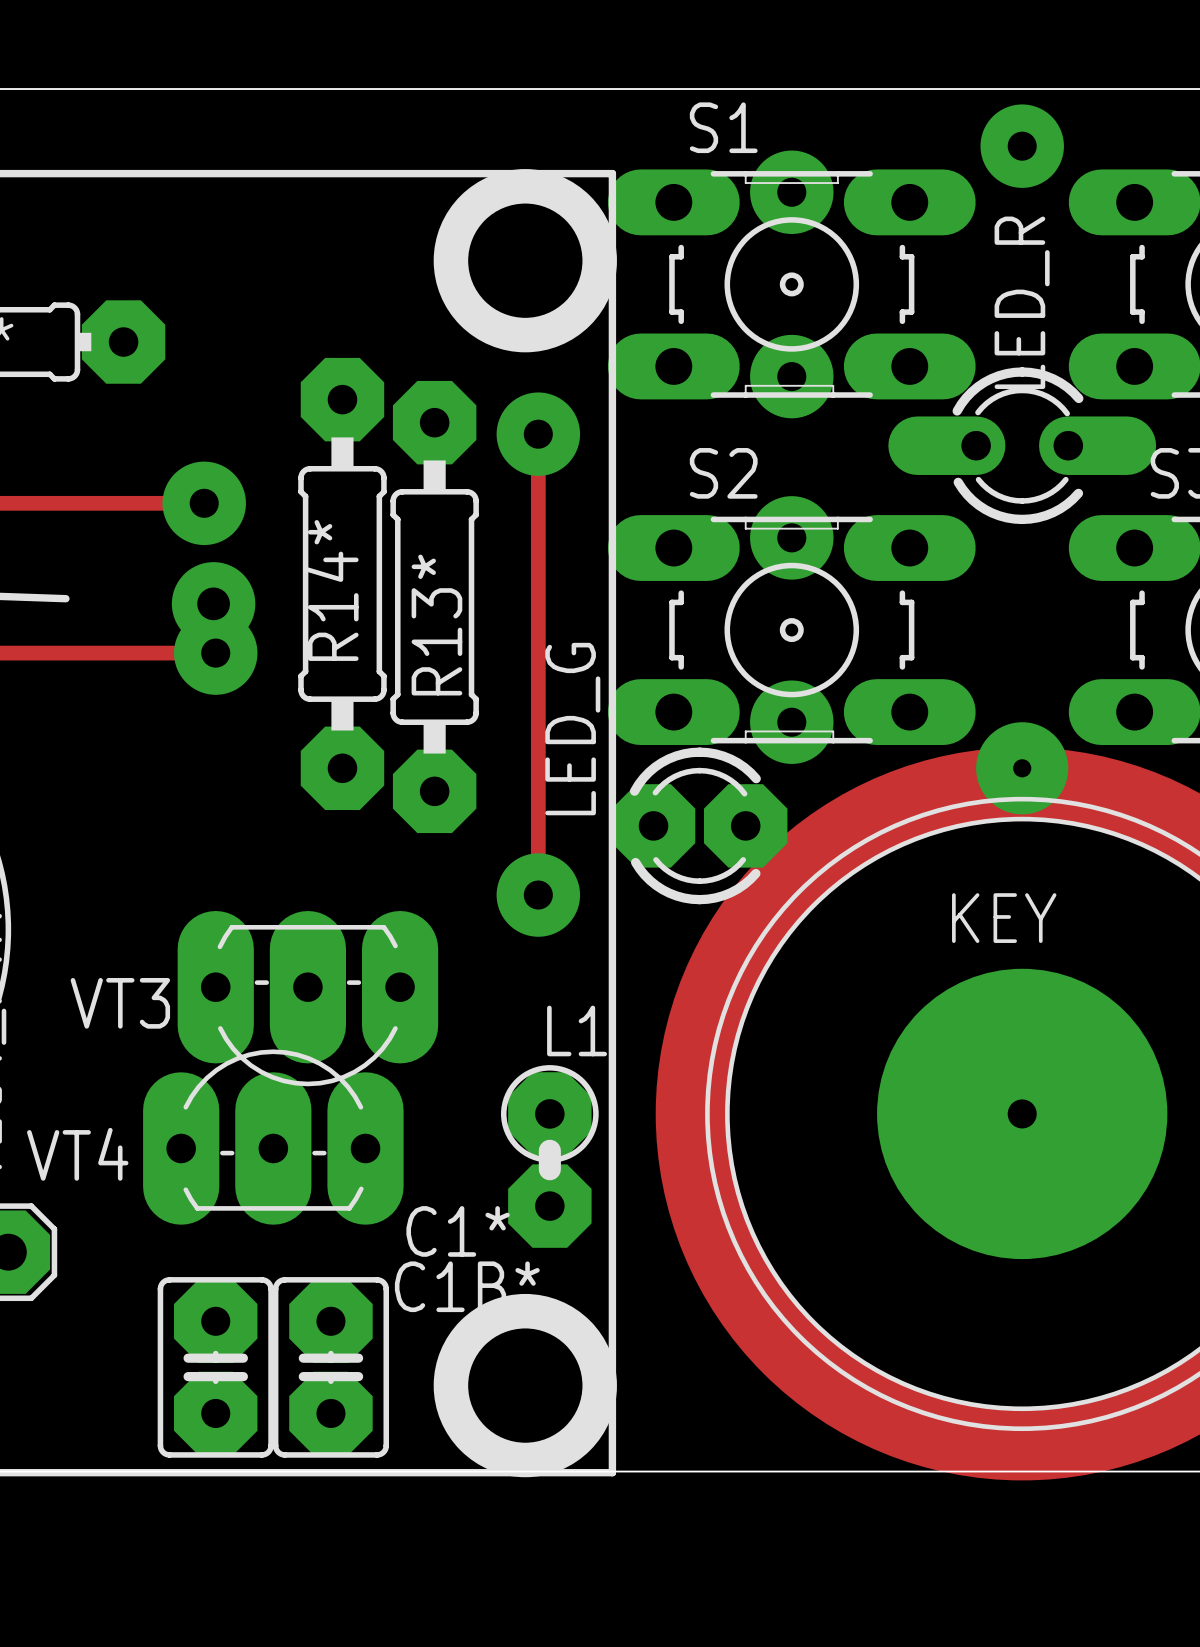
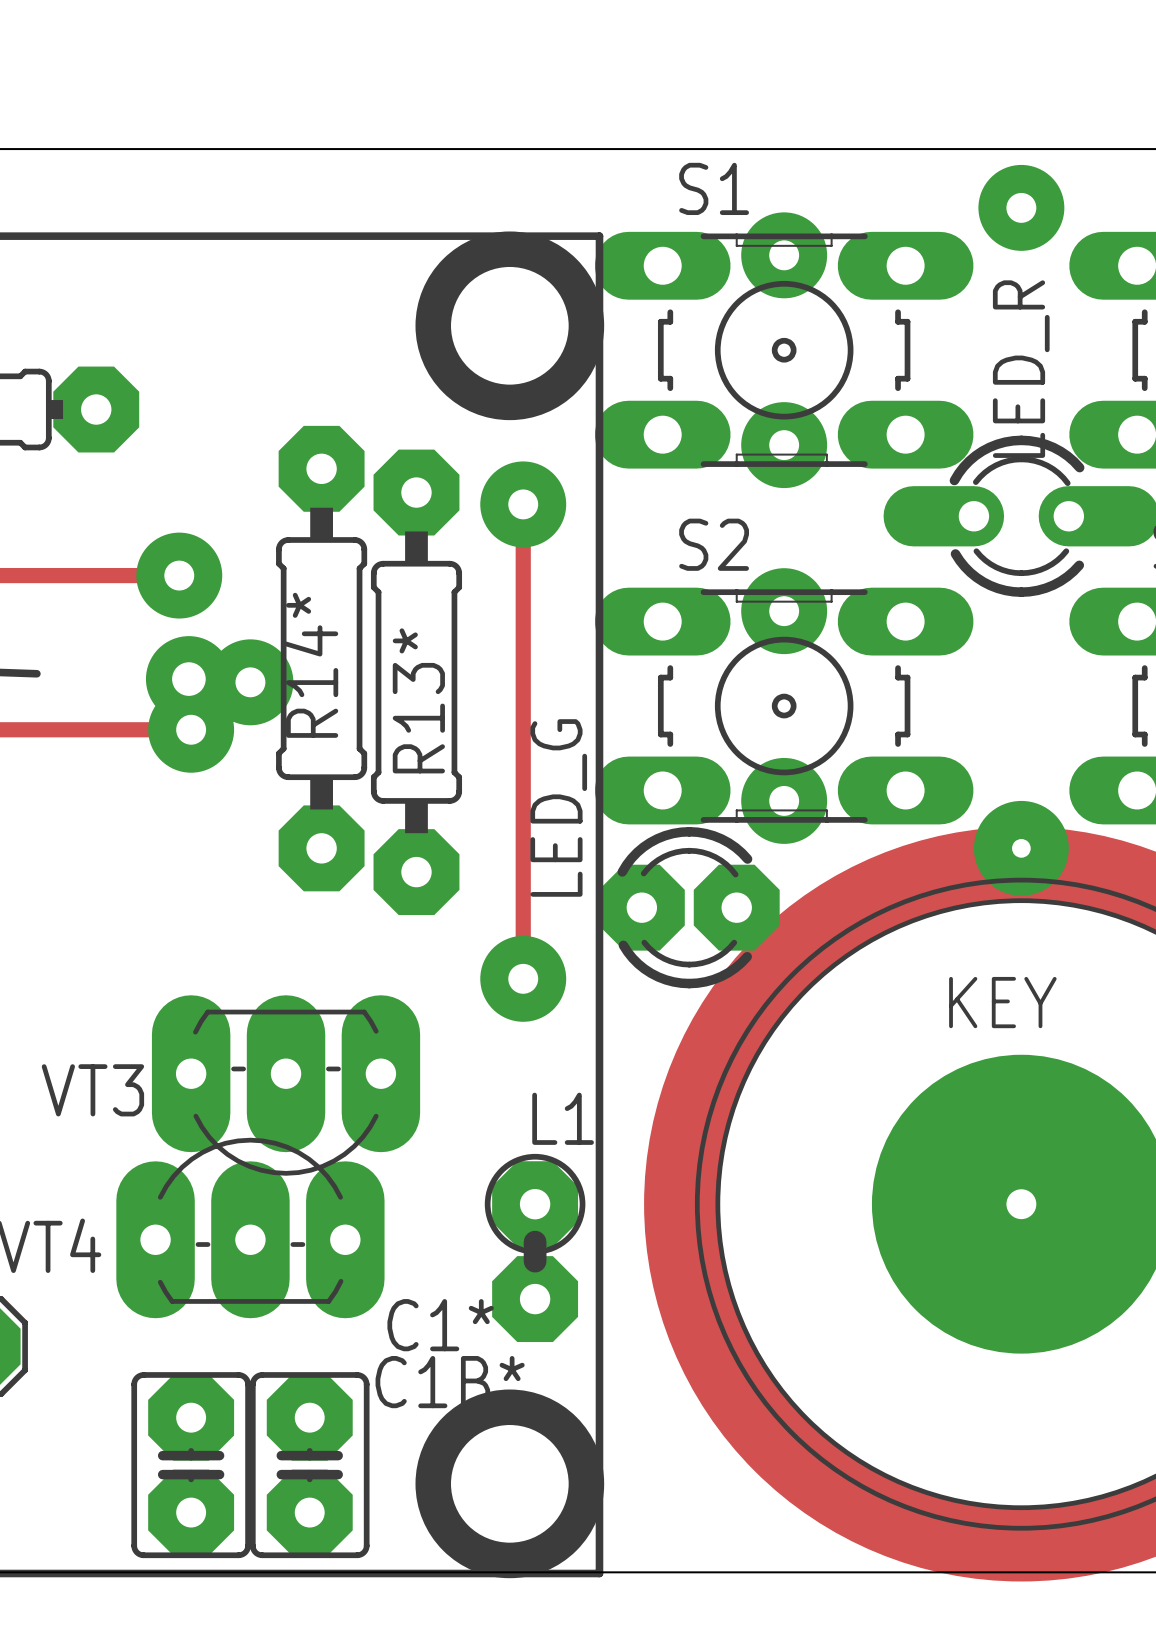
via: none -> (250, 682)

